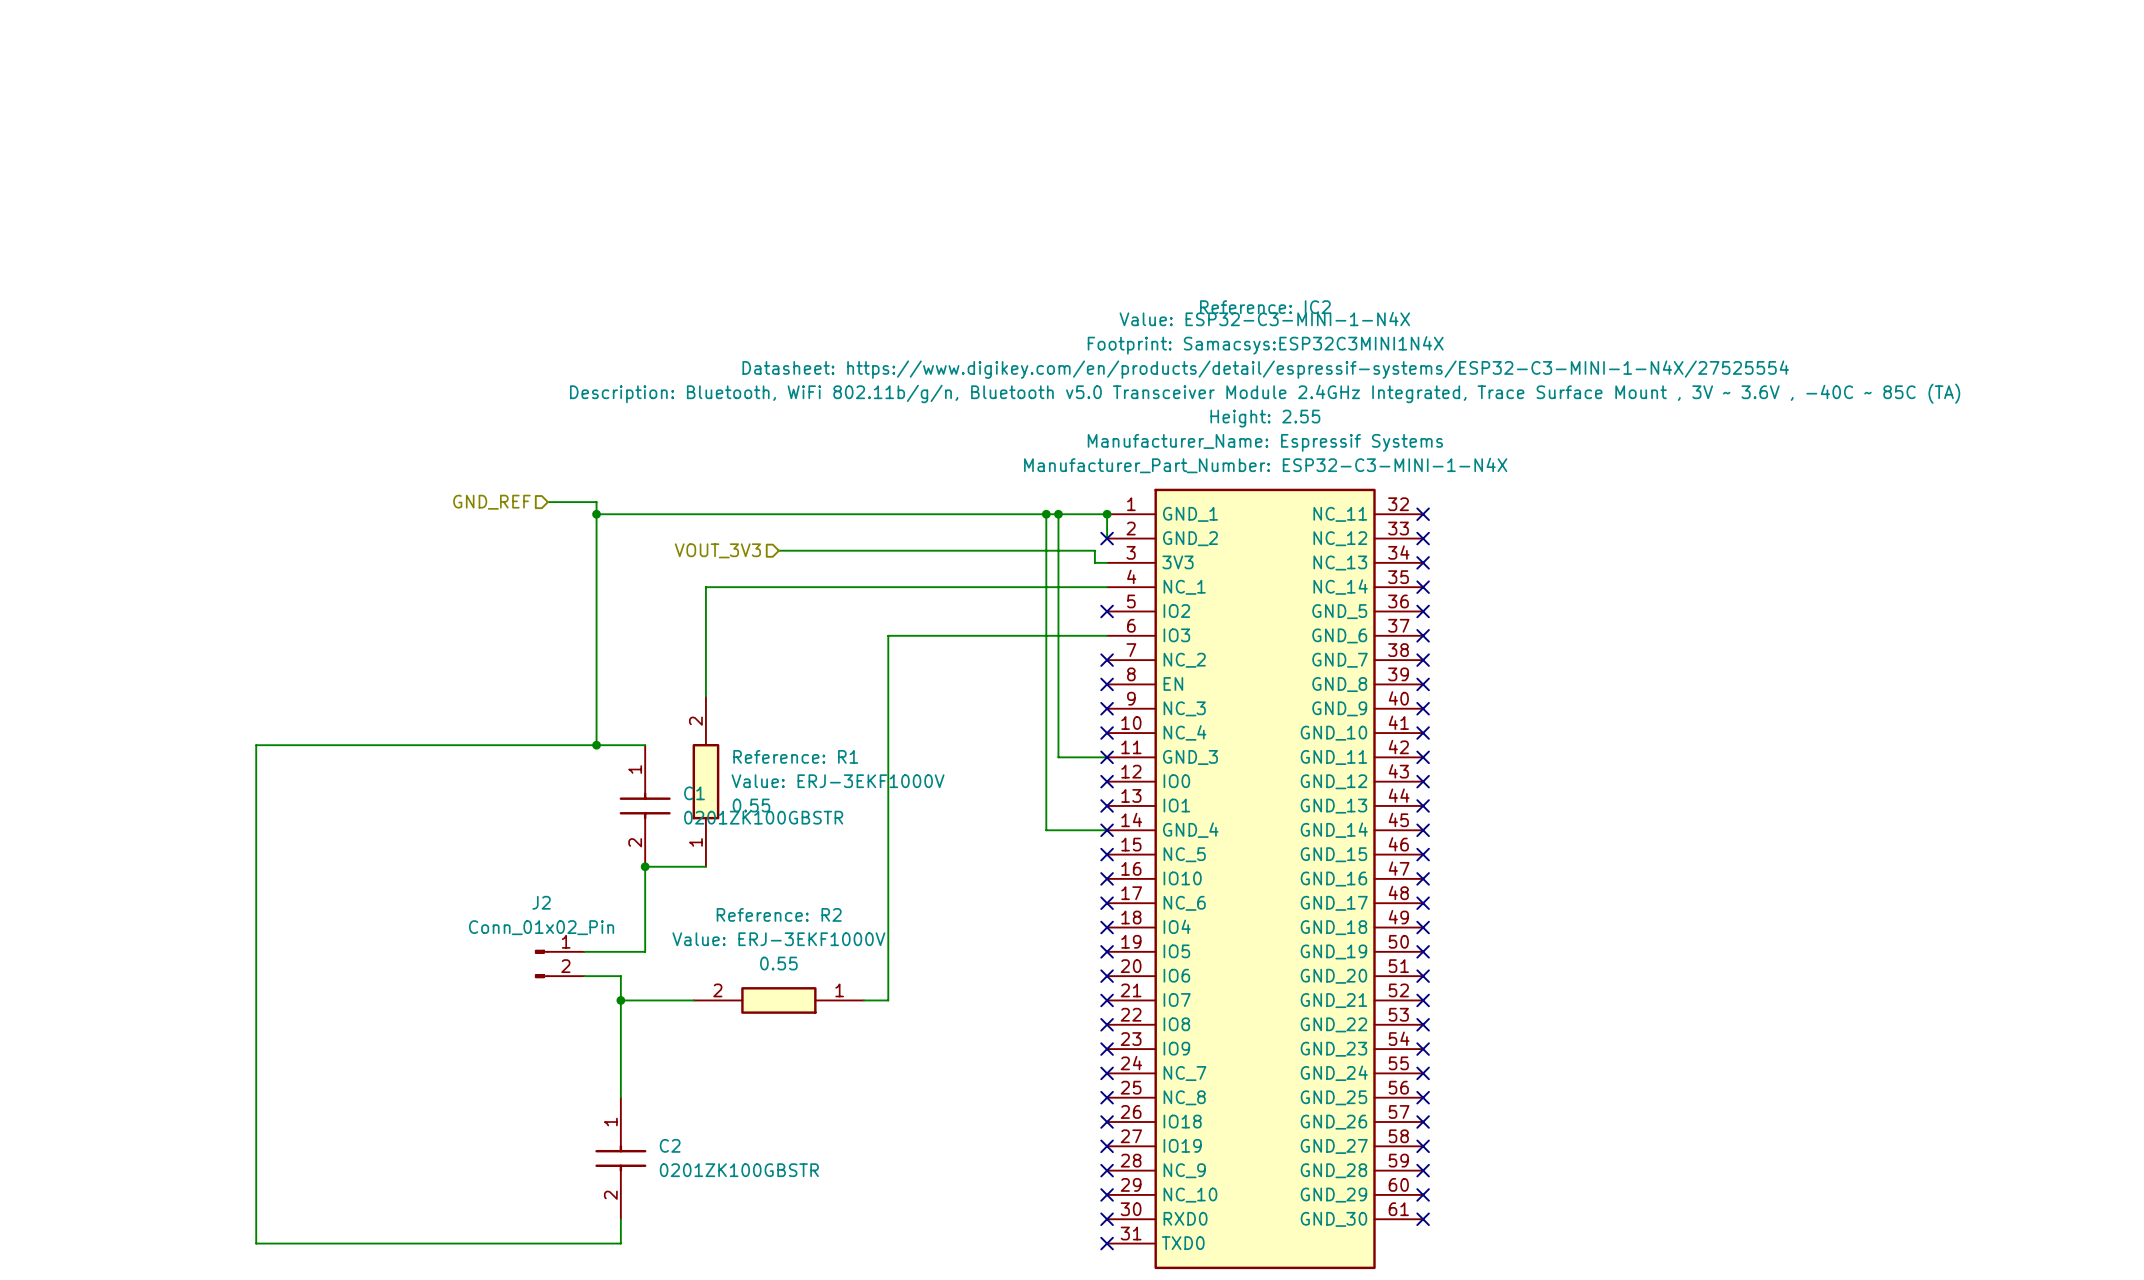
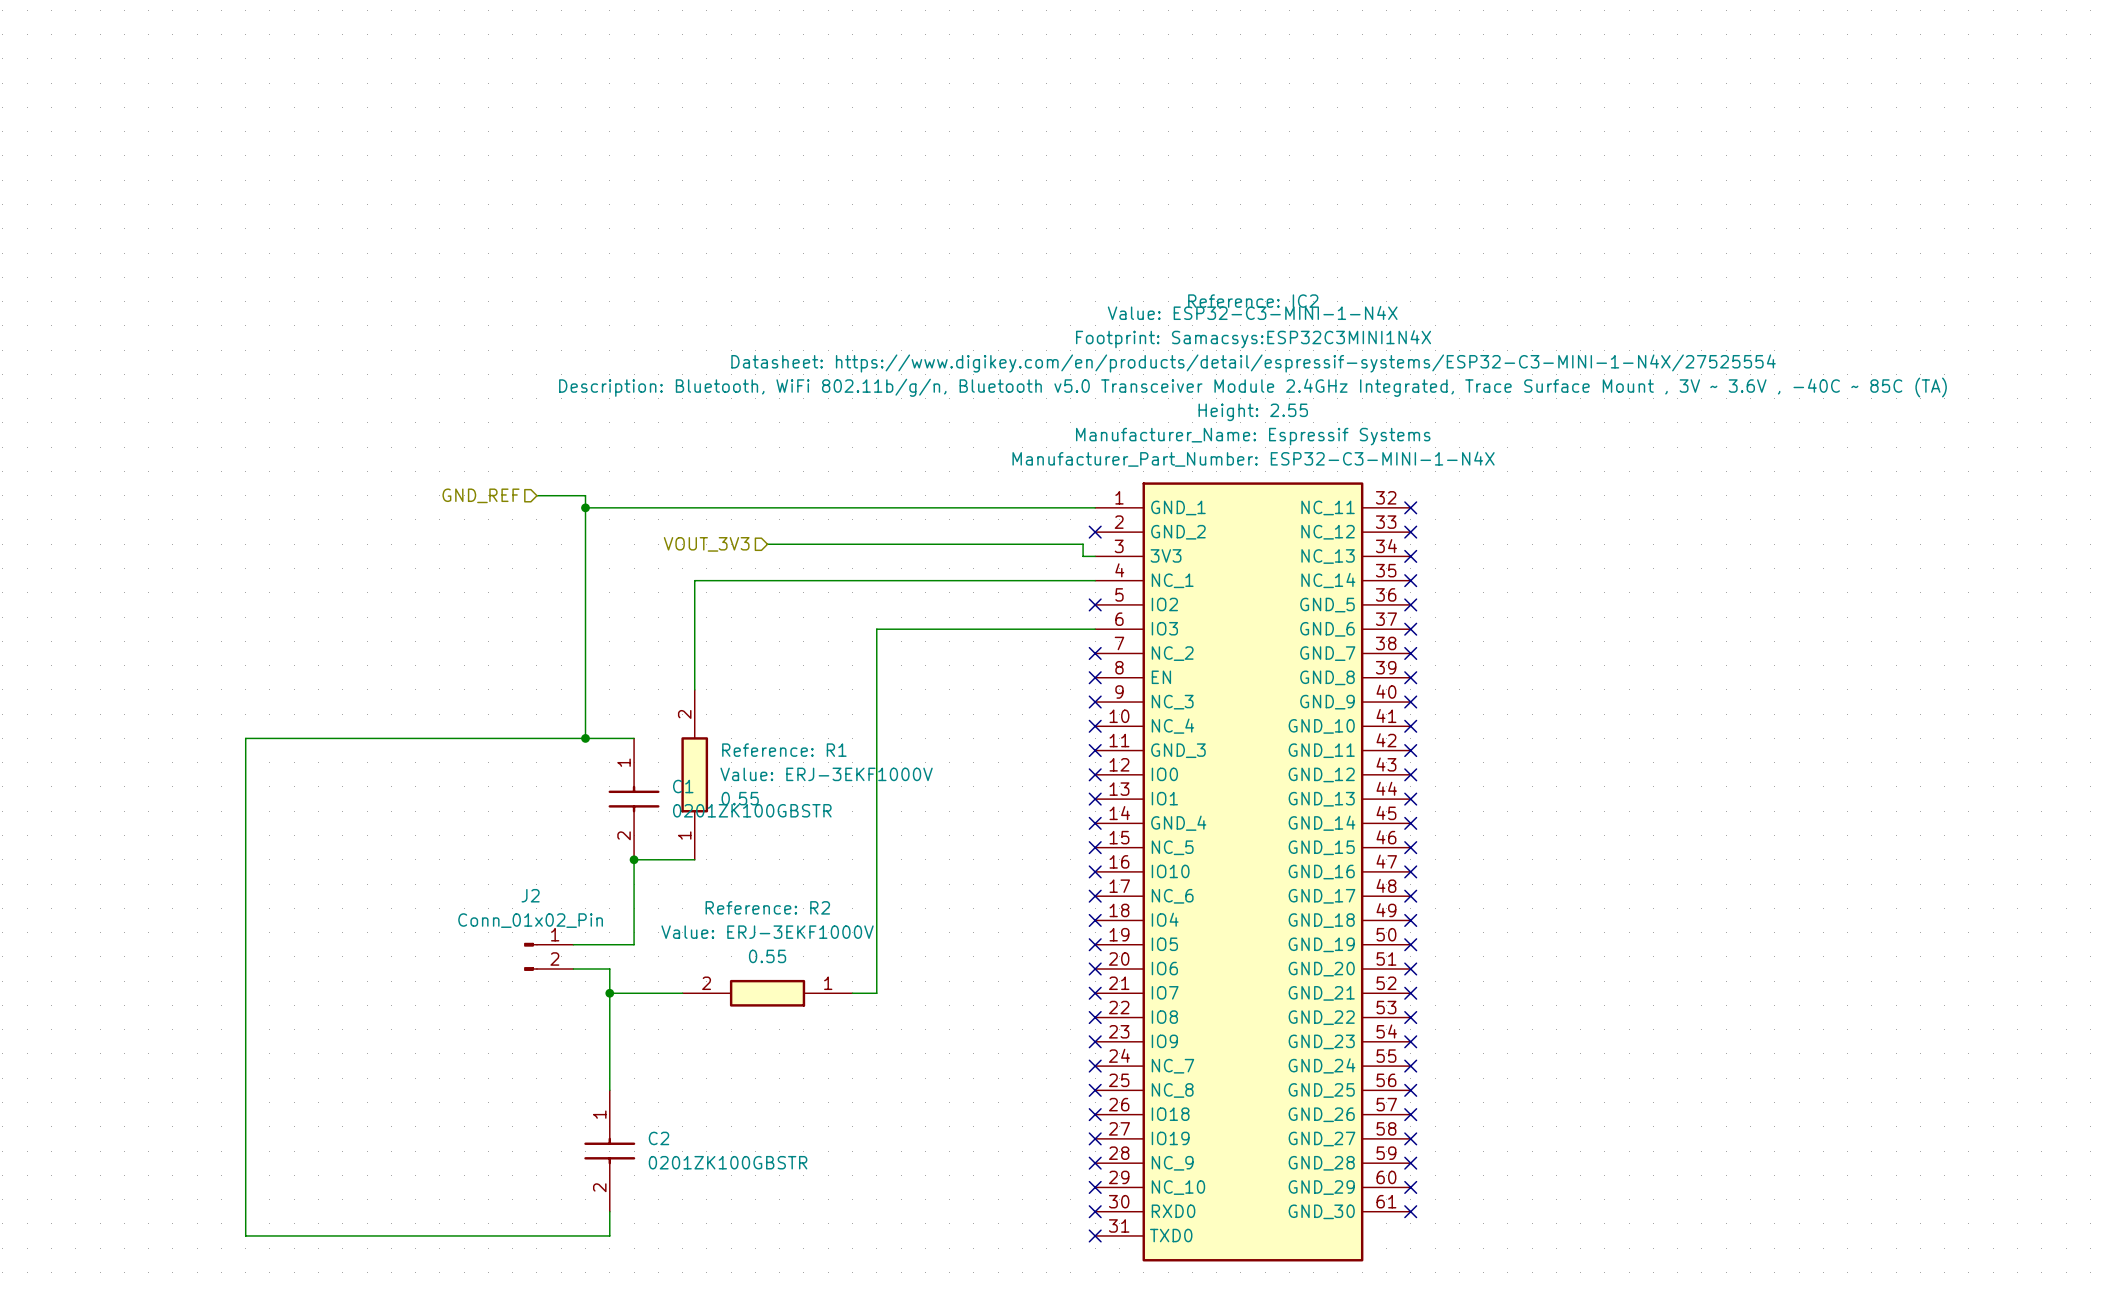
wire: (1046, 514) (1046, 830) (1107, 830) -> none
junction: (1046, 514) -> none
wire: (1058, 514) (1058, 757) (1107, 757) -> none
junction: (1058, 514) -> none
wire: (1107, 514) (1107, 538) -> none
junction: (1107, 514) -> none

